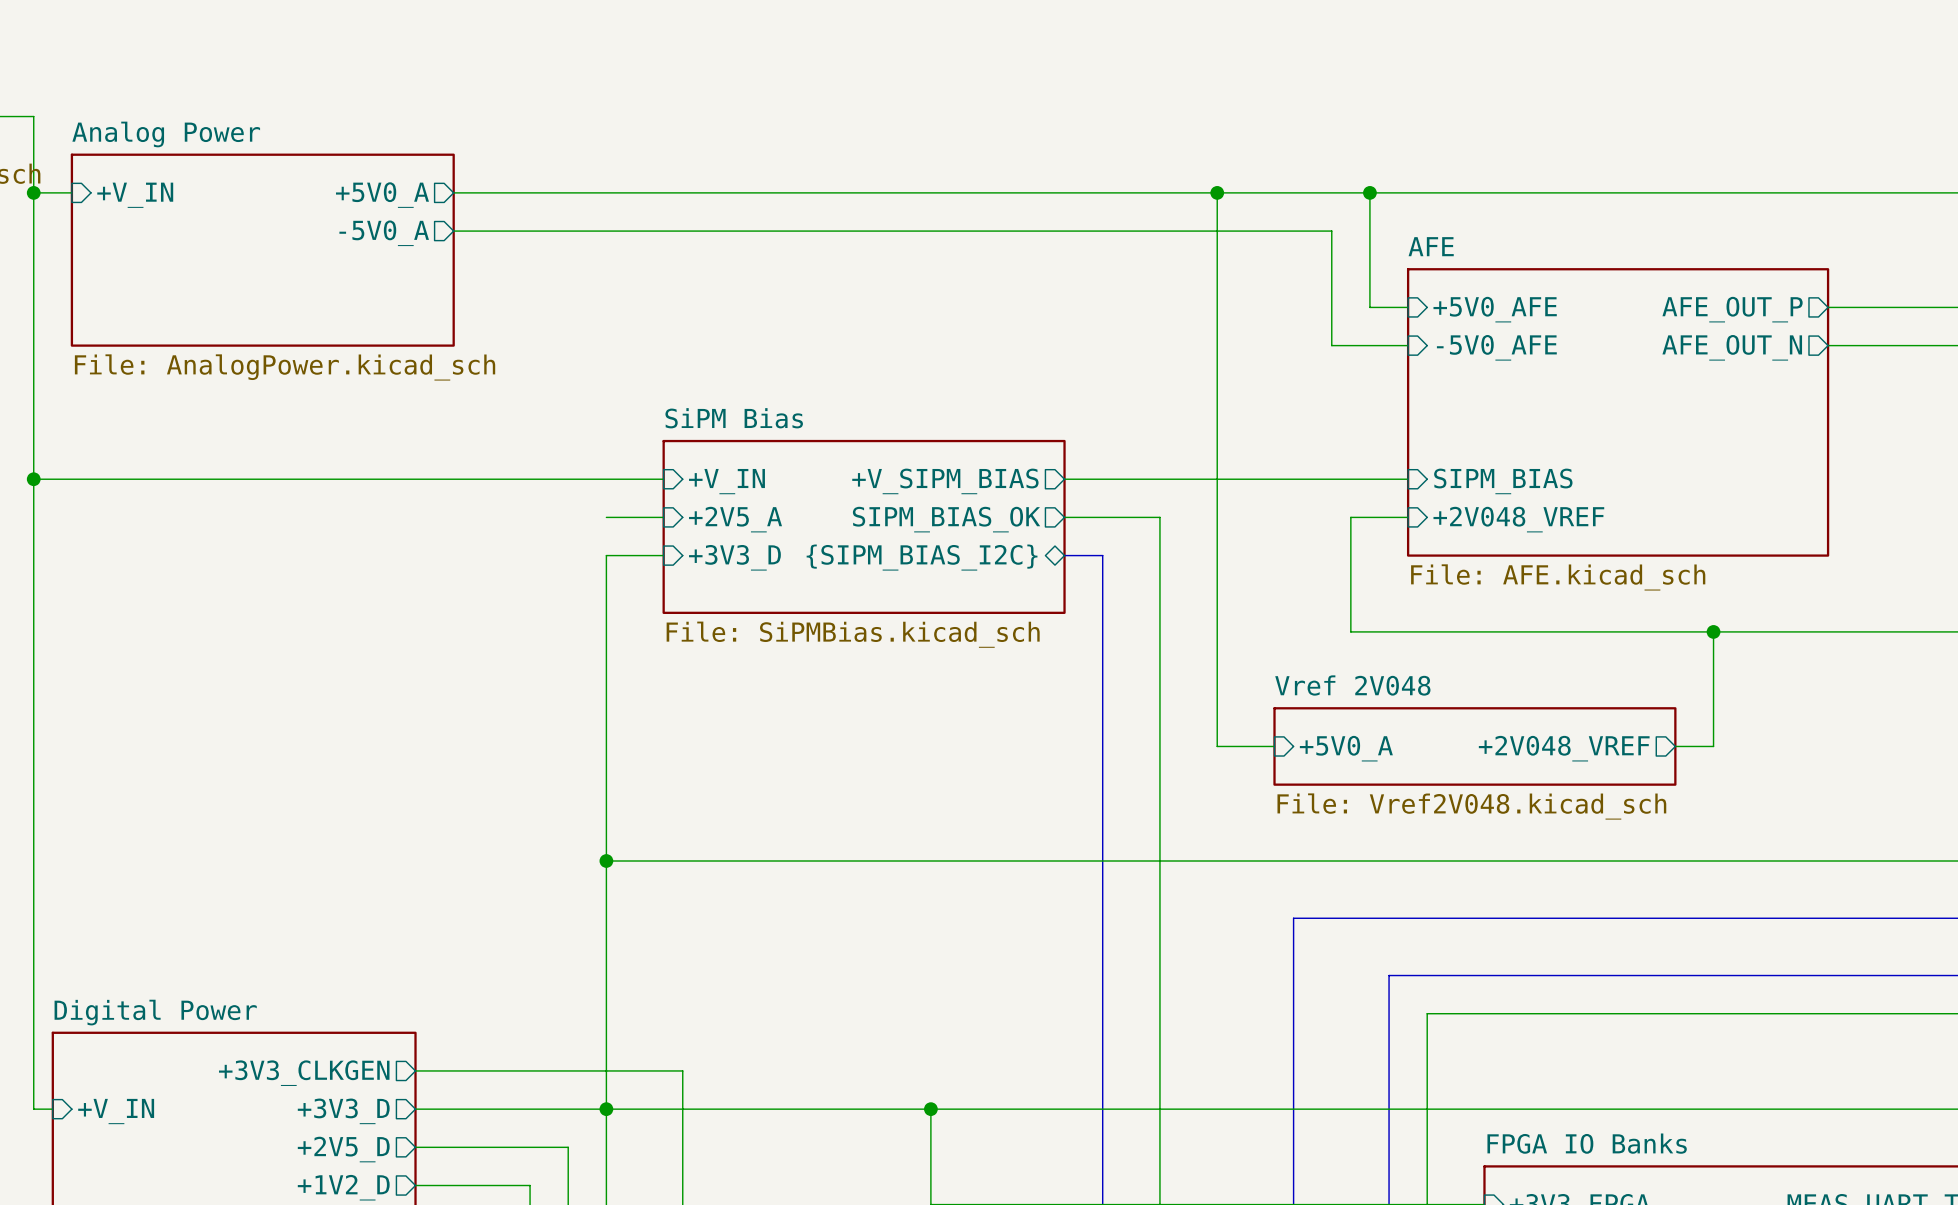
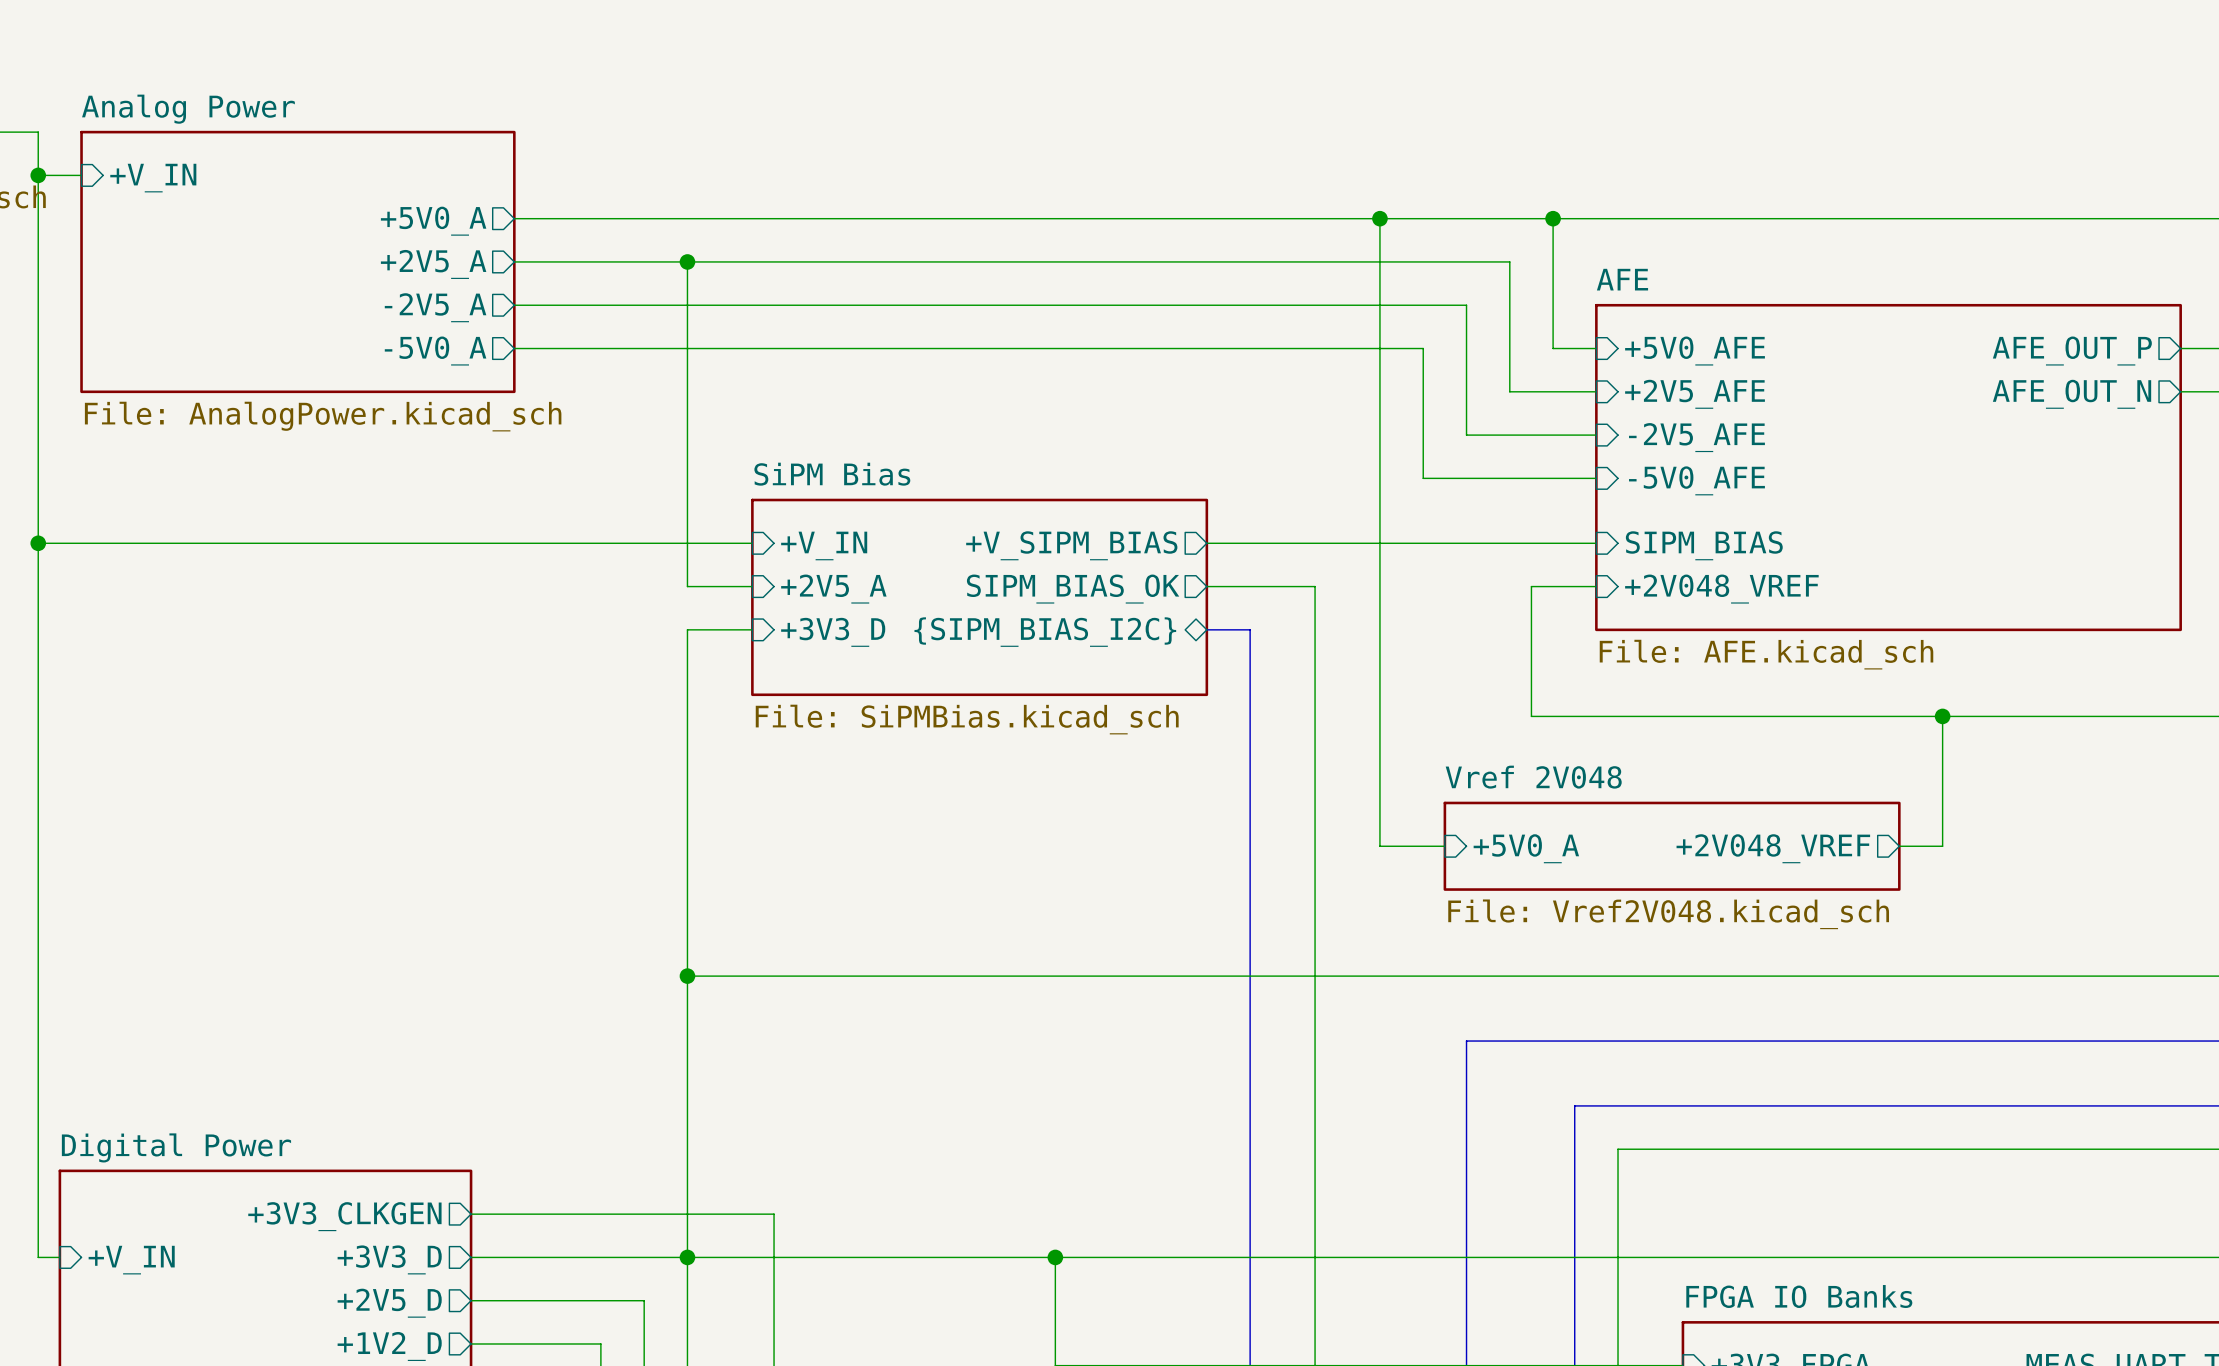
wire: (33, 192) (71, 192) -> (38, 175) (81, 175)
junction position: (33, 192) -> (38, 175)
sheet pin position: +V_IN (135, 195) -> +V_IN (153, 178)
sheet Analog Power: none -> File: AnalogPower.kicad_sch (297, 261)
wire: none -> (687, 261) (687, 586)
junction: none -> (687, 261)
sheet pin: -5V0_A (384, 233) -> +2V5_A (433, 264)
sheet Analog Power: File: AnalogPower.kicad_sch (262, 250) -> none
wire: none -> (514, 305) (1466, 305) (1466, 435) (1596, 435)
sheet pin: none -> -2V5_A (435, 307)
wire: none -> (514, 348) (1423, 348) (1423, 478) (1596, 478)
wire: (1828, 307) (1923, 307) -> none
sheet pin: none -> -5V0_A (435, 351)
sheet pin position: AFE_OUT_P (1732, 309) -> AFE_OUT_P (2072, 351)
wire: (1828, 345) (1923, 345) -> none
sheet pin: -5V0_AFE (1496, 347) -> +2V5_AFE (1695, 394)
sheet pin position: AFE_OUT_N (1732, 347) -> AFE_OUT_N (2072, 394)
sheet pin: none -> -2V5_AFE (1696, 437)
sheet AFE: File: AFE.kicad_sch (1618, 412) -> none
sheet AFE: none -> File: AFE.kicad_sch (1888, 467)
sheet pin: none -> -5V0_AFE (1696, 480)

